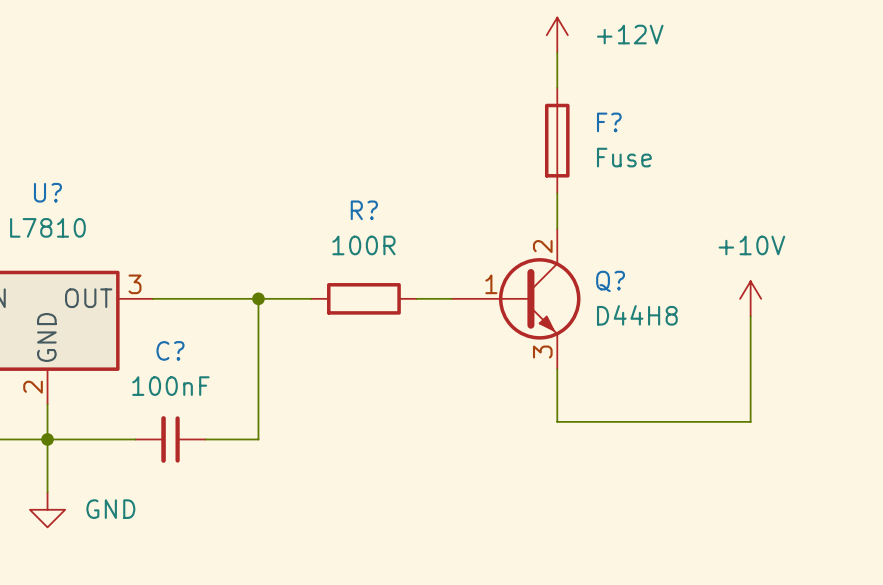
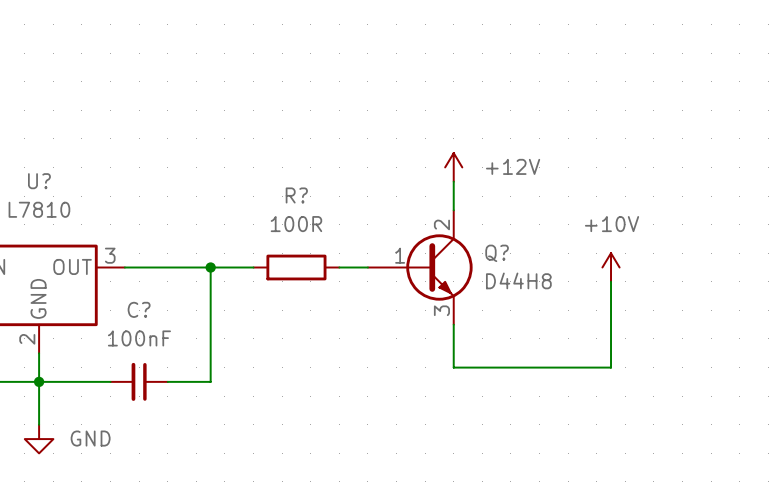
power symbol position: +12V (557, 35) -> +12V (453, 167)
wire: (557, 52) (557, 87) -> none
F?: Fuse (557, 140) -> none

